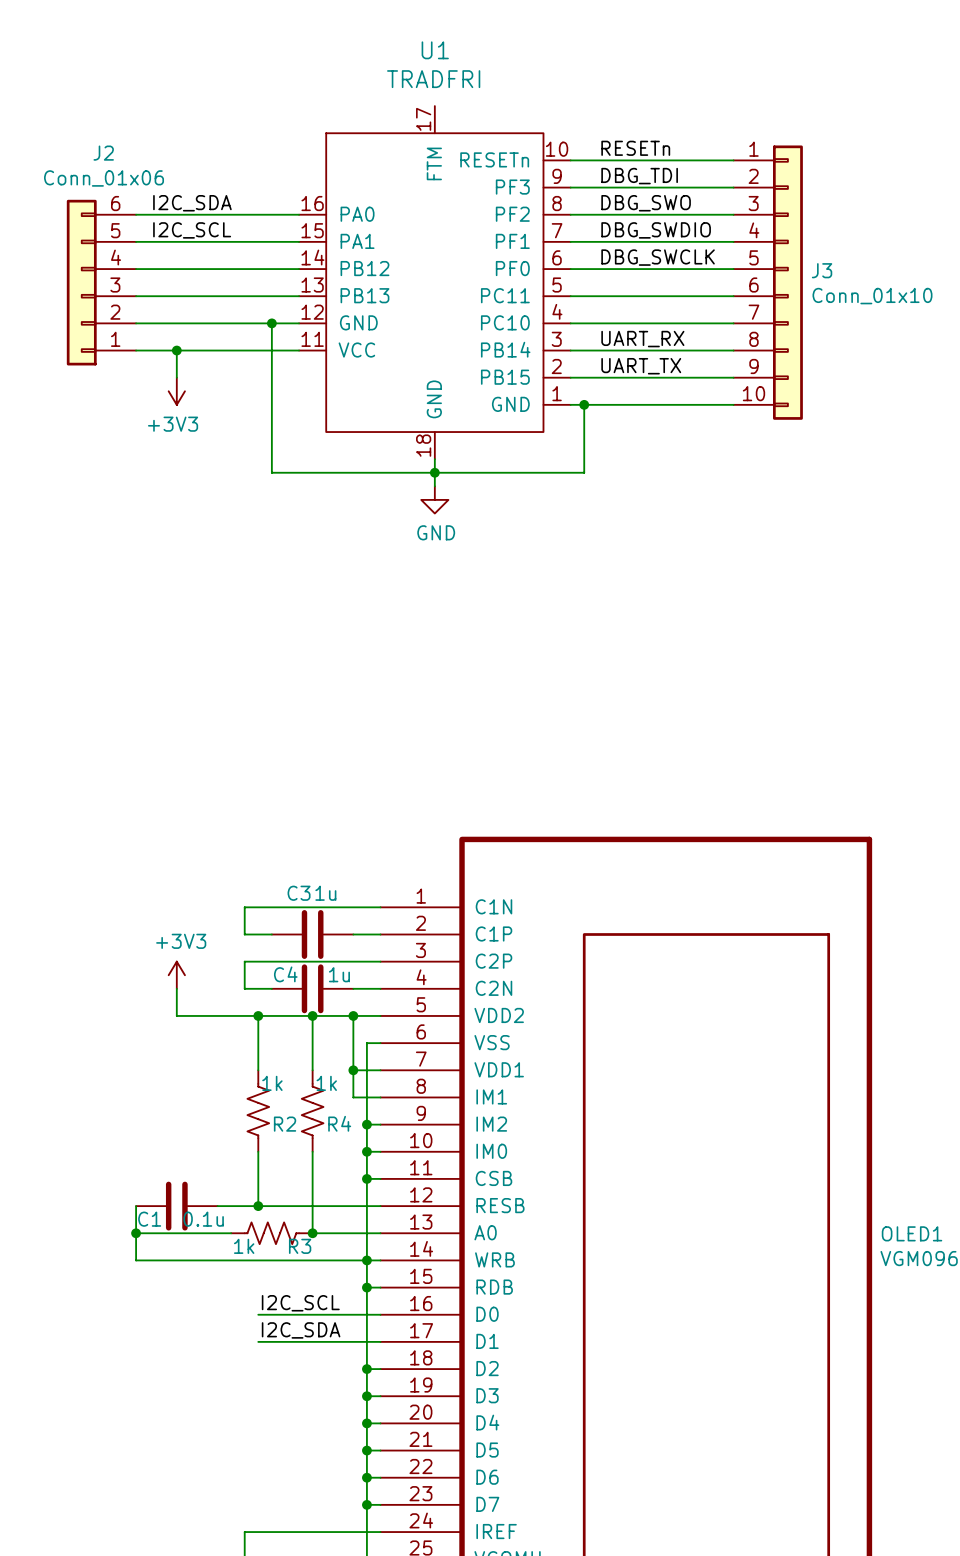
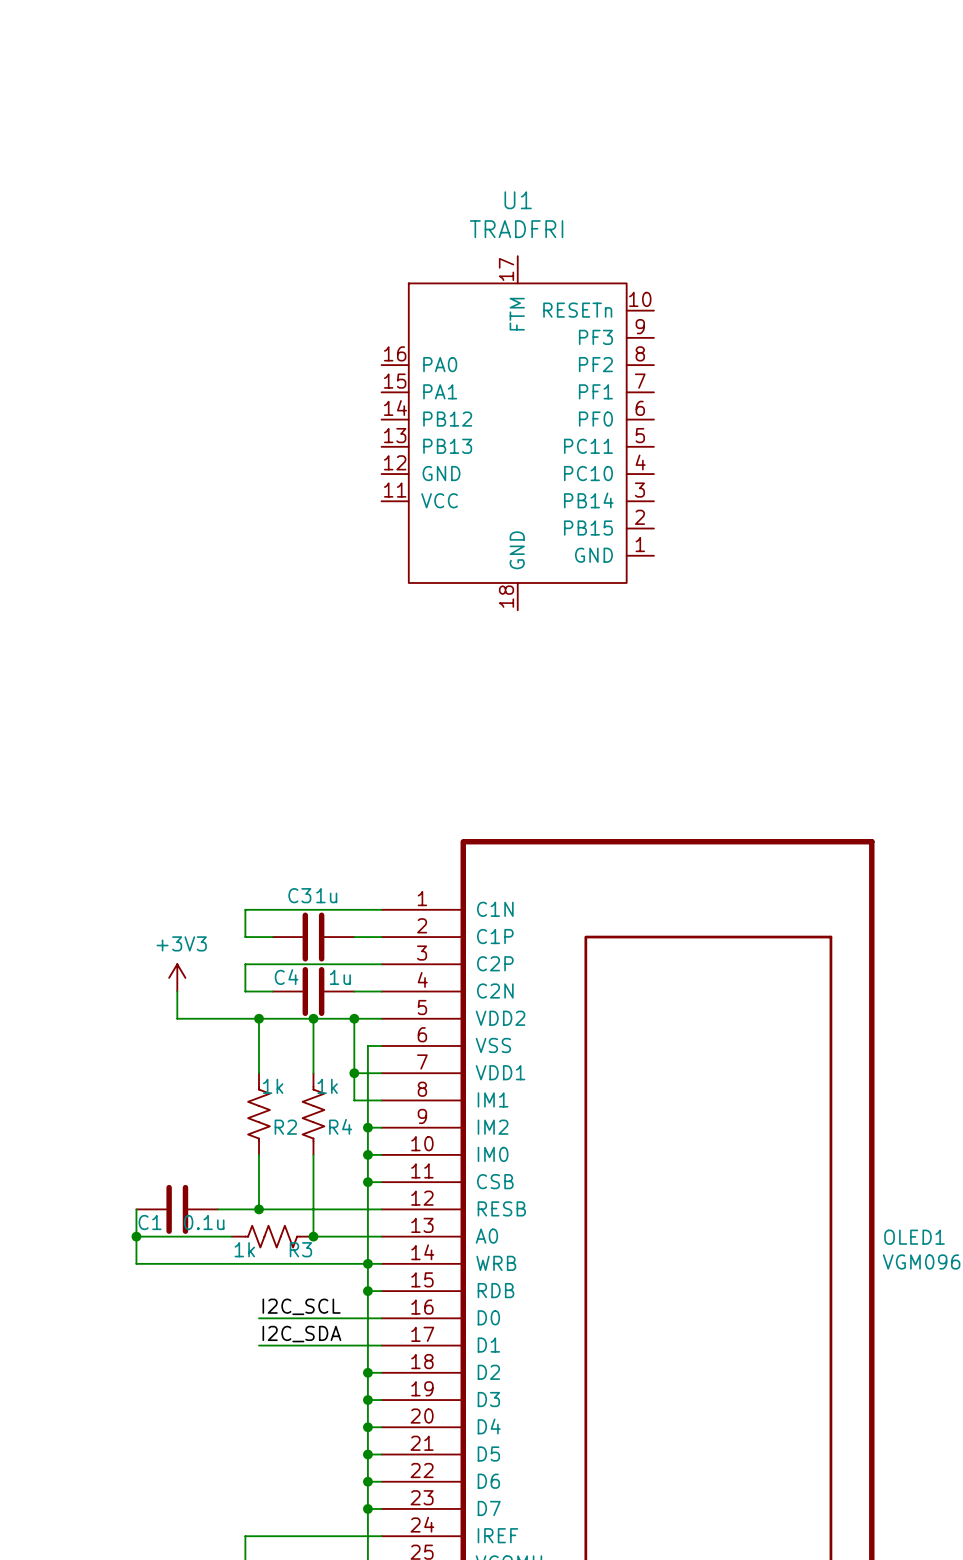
label: RESETn (635, 148) -> none
wire: (570, 160) (733, 160) -> none
label: DBG_TDI (639, 176) -> none
wire: (570, 187) (733, 187) -> none
label: I2C_SDA (192, 203) -> none
label: DBG_SWO (646, 203) -> none
wire: (136, 214) (299, 214) -> none
wire: (570, 214) (733, 214) -> none
label: I2C_SCL (192, 230) -> none
label: DBG_SWDIO (656, 230) -> none
wire: (136, 241) (299, 241) -> none
wire: (570, 241) (733, 241) -> none
label: DBG_SWCLK (658, 257) -> none
wire: (136, 269) (299, 269) -> none
wire: (570, 269) (733, 269) -> none
J2: Conn_01x06 (101, 282) -> none
U1 position: (434, 282) -> (517, 433)
J3: Conn_01x10 (768, 282) -> none
wire: (136, 296) (299, 296) -> none
wire: (570, 296) (733, 296) -> none
wire: (136, 323) (299, 323) -> none
wire: (271, 323) (271, 472) (584, 472) (584, 404) -> none
junction: (271, 323) -> none
wire: (570, 323) (733, 323) -> none
label: UART_RX (642, 339) -> none
wire: (136, 350) (299, 350) -> none
wire: (176, 350) (176, 377) -> none
junction: (176, 350) -> none
wire: (570, 350) (733, 350) -> none
label: UART_TX (641, 366) -> none
wire: (570, 377) (733, 377) -> none
power symbol: +3V3 (176, 391) -> none
wire: (570, 404) (733, 404) -> none
junction: (584, 404) -> none
wire: (434, 459) (434, 486) -> none
junction: (434, 472) -> none
power symbol: GND (434, 499) -> none

